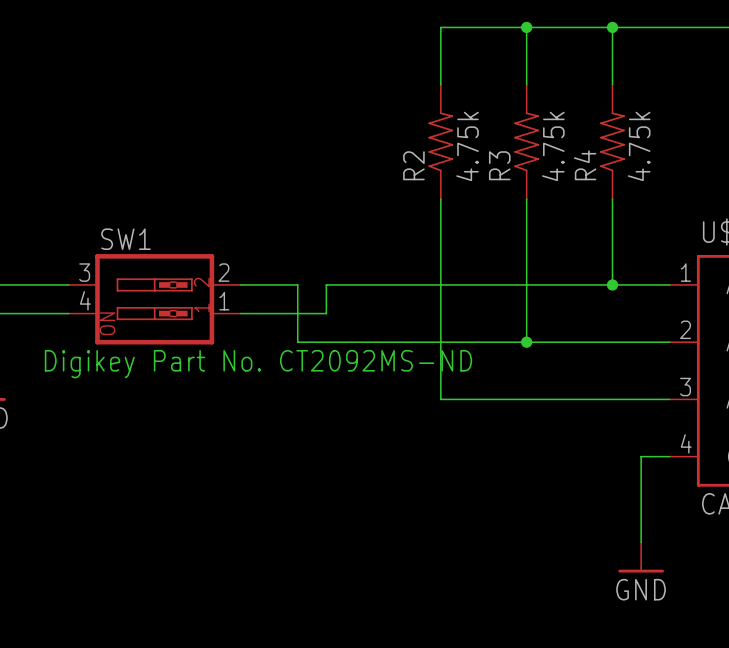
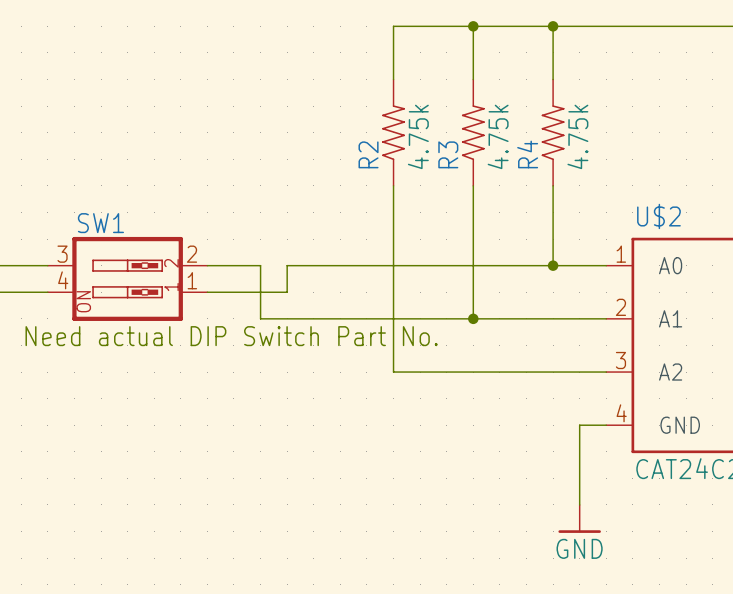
text: Digikey Part No. CT2092MS-ND (258, 364) -> Need actual DIP Switch Part No. (231, 336)

